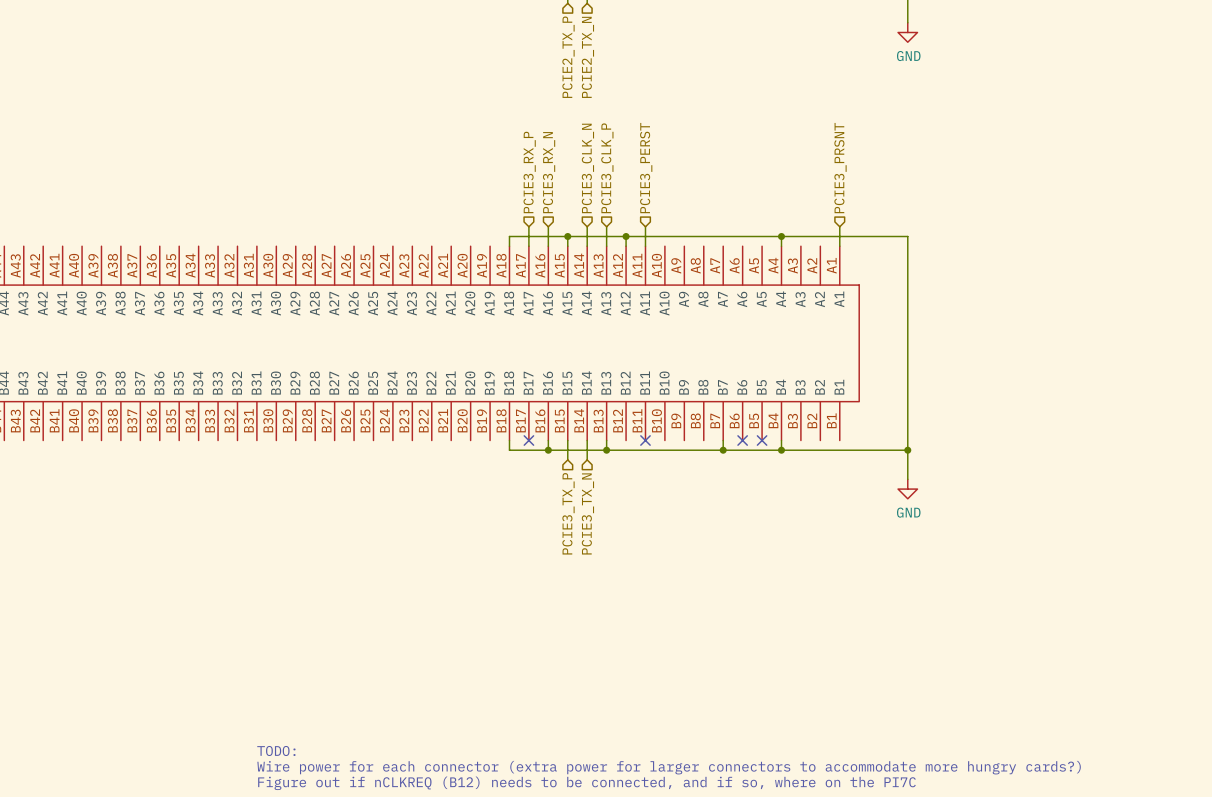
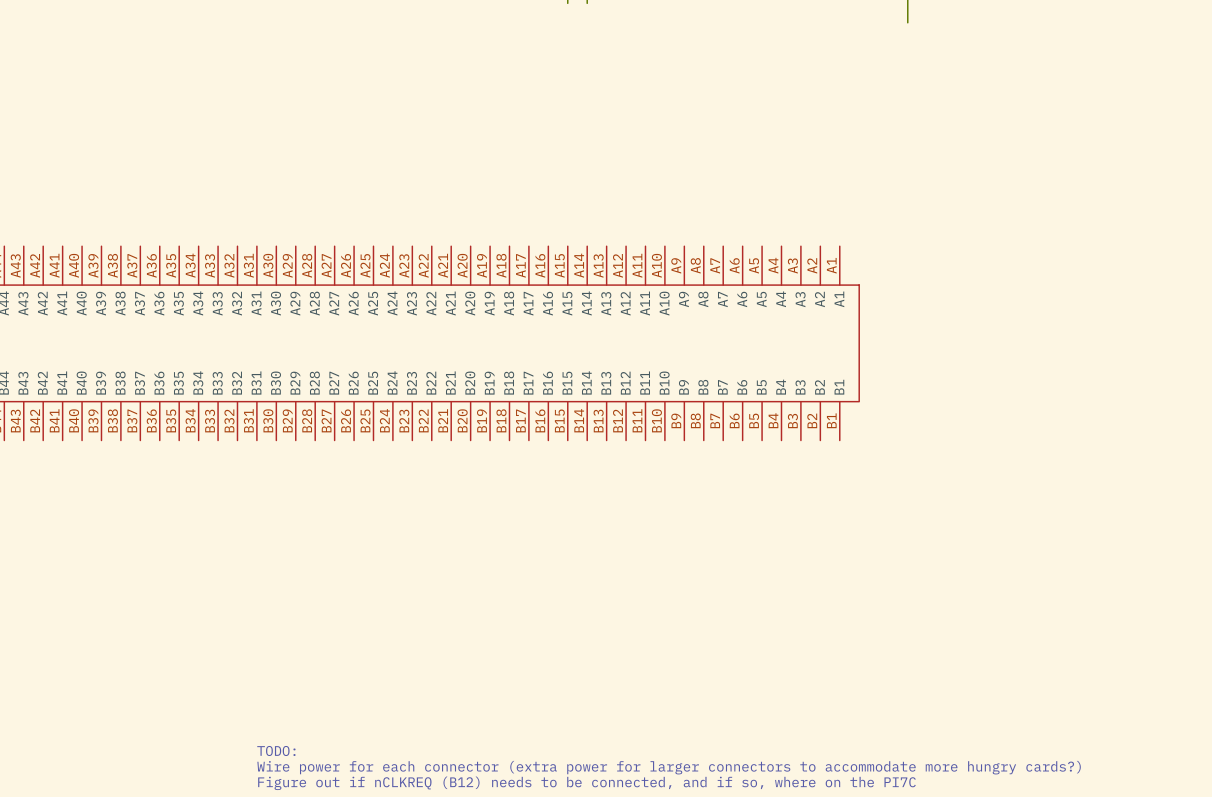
power symbol: GND (907, 32) -> none
hierarchical label: PCIE2_TX_P (568, 57) -> none
hierarchical label: PCIE2_TX_N (587, 57) -> none
hierarchical label: PCIE3_CLK_N (587, 168) -> none
hierarchical label: PCIE3_CLK_P (607, 168) -> none
hierarchical label: PCIE3_PERST (646, 168) -> none
hierarchical label: PCIE3_PRSNT (840, 168) -> none
hierarchical label: PCIE3_RX_P (529, 172) -> none
hierarchical label: PCIE3_RX_N (549, 172) -> none
wire: (528, 226) (528, 246) -> none
wire: (548, 226) (548, 246) -> none
wire: (587, 226) (587, 246) -> none
wire: (606, 226) (606, 246) -> none
wire: (645, 226) (645, 246) -> none
wire: (839, 226) (839, 246) -> none
wire: (567, 236) (567, 246) -> none
junction: (567, 236) -> none
wire: (626, 236) (626, 246) -> none
junction: (626, 236) -> none
wire: (781, 236) (781, 246) -> none
junction: (781, 236) -> none
wire: (509, 246) (509, 236) (907, 236) (907, 479) -> none
wire: (509, 440) (509, 450) (907, 450) -> none
no-connect mark: (528, 440) -> none
wire: (548, 440) (548, 450) -> none
wire: (567, 440) (567, 459) -> none
wire: (587, 440) (587, 459) -> none
wire: (606, 440) (606, 450) -> none
no-connect mark: (645, 440) -> none
wire: (723, 440) (723, 450) -> none
no-connect mark: (742, 440) -> none
no-connect mark: (762, 440) -> none
wire: (781, 440) (781, 450) -> none
junction: (548, 450) -> none
junction: (606, 450) -> none
junction: (723, 450) -> none
junction: (781, 450) -> none
junction: (907, 450) -> none
power symbol: GND (907, 489) -> none
hierarchical label: PCIE3_TX_P (568, 513) -> none
hierarchical label: PCIE3_TX_N (587, 513) -> none

